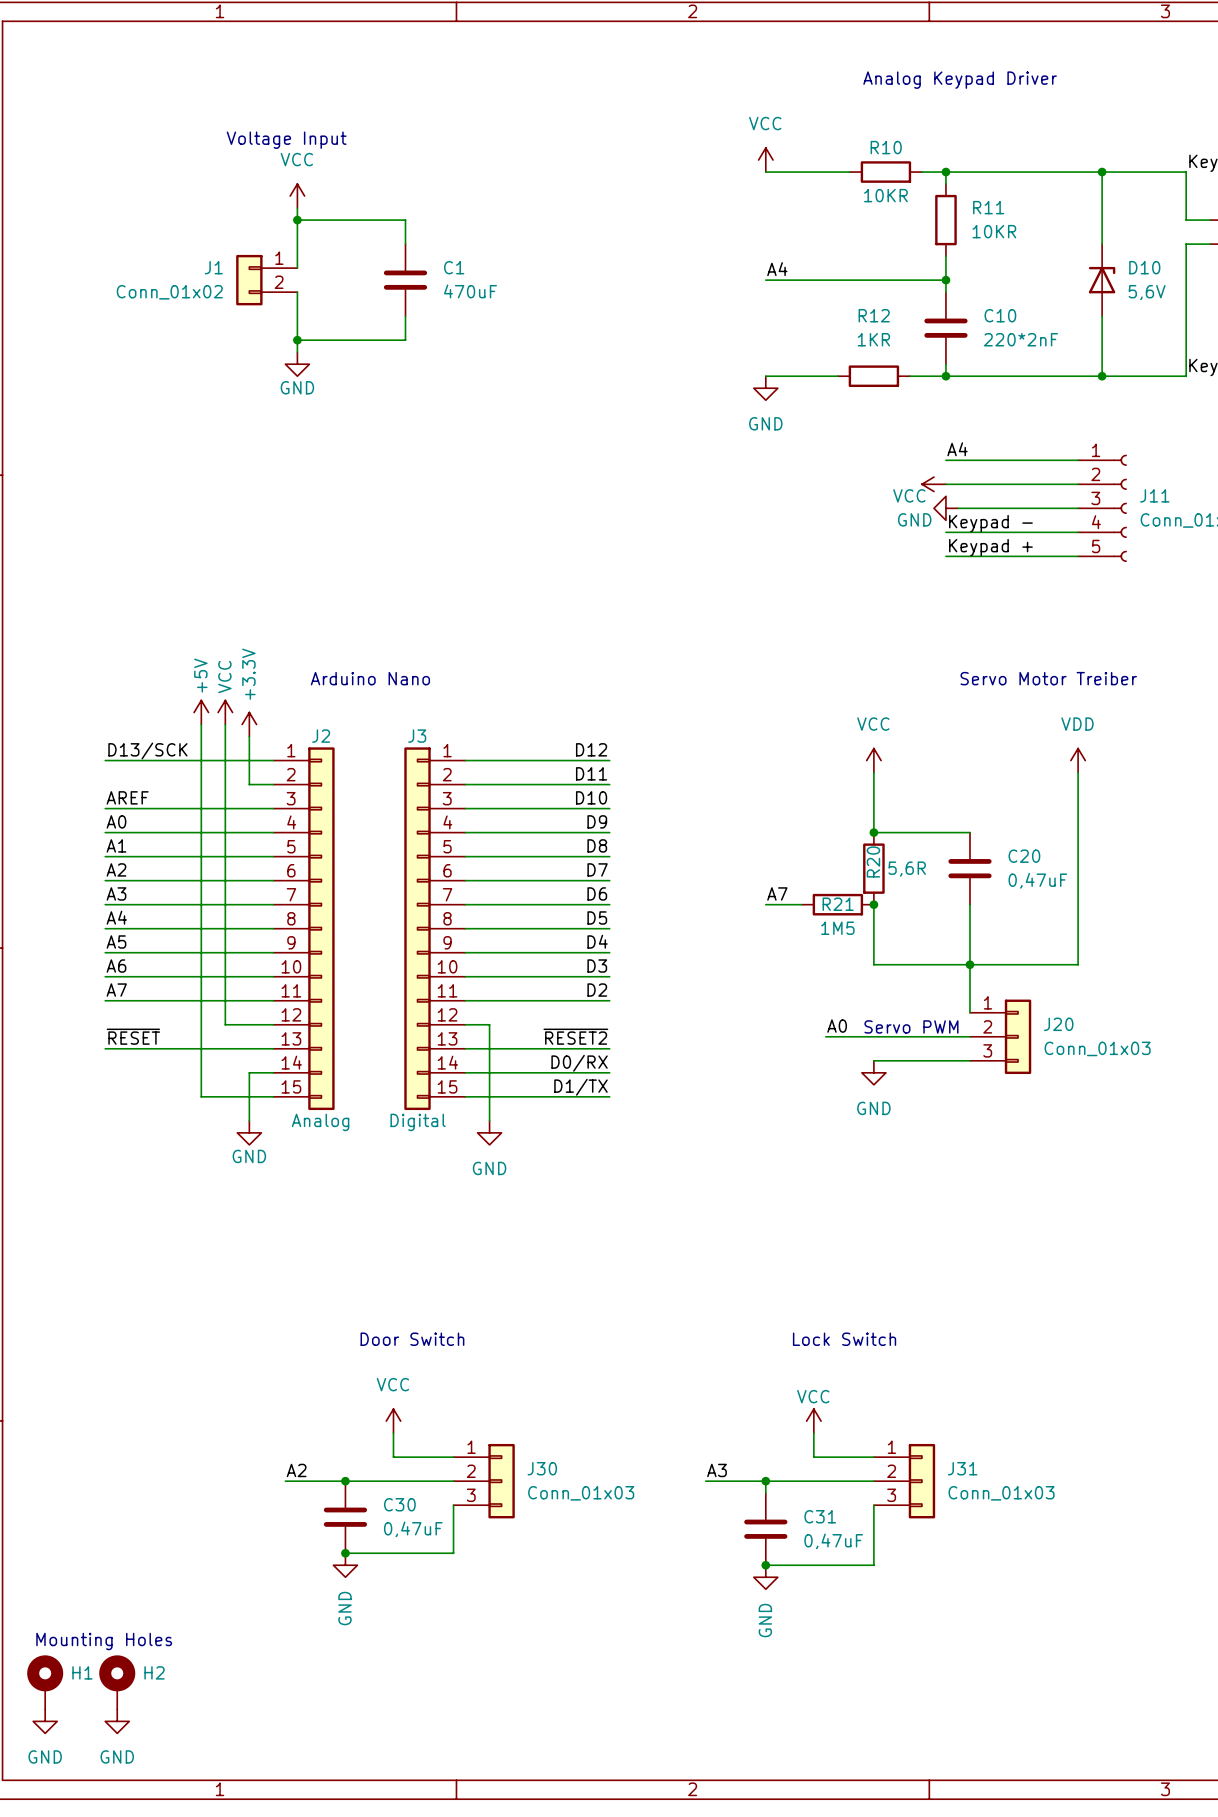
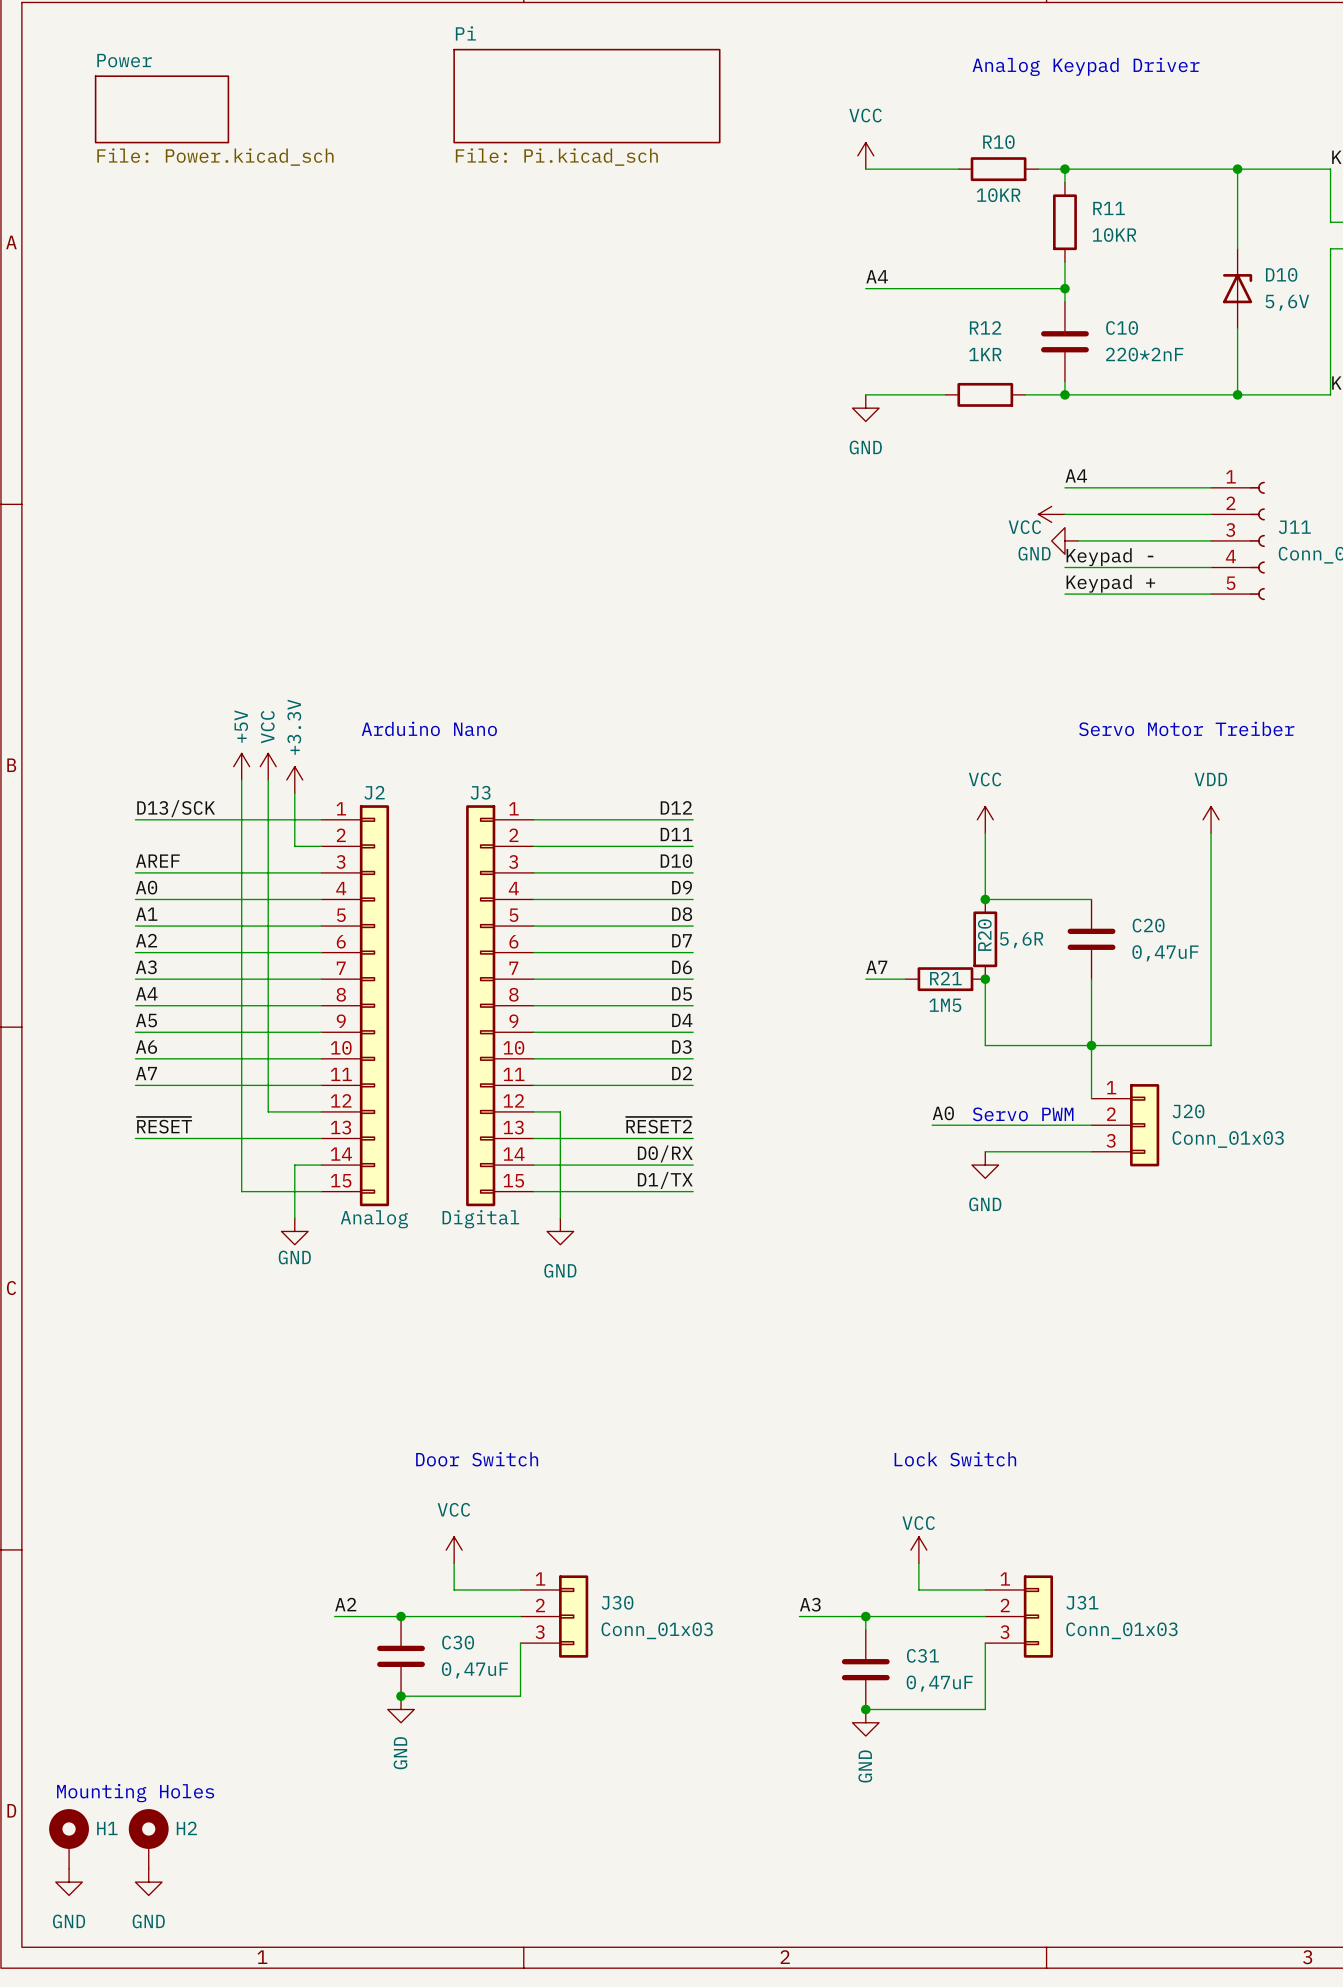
sheet Pi: none -> File: Pi.kicad_sch (586, 96)
sheet Power: none -> File: Power.kicad_sch (162, 109)
text: Voltage Input (286, 140) -> none
power symbol: VCC (297, 196) -> none
wire: (297, 208) (297, 268) -> none
wire: (297, 220) (405, 220) (405, 244) -> none
junction: (297, 220) -> none
J1: Conn_01x02 (266, 280) -> none
C1: 470uF (405, 280) -> none
wire: (297, 292) (297, 352) -> none
wire: (405, 316) (405, 340) (297, 340) -> none
junction: (297, 340) -> none
power symbol: GND (297, 364) -> none

